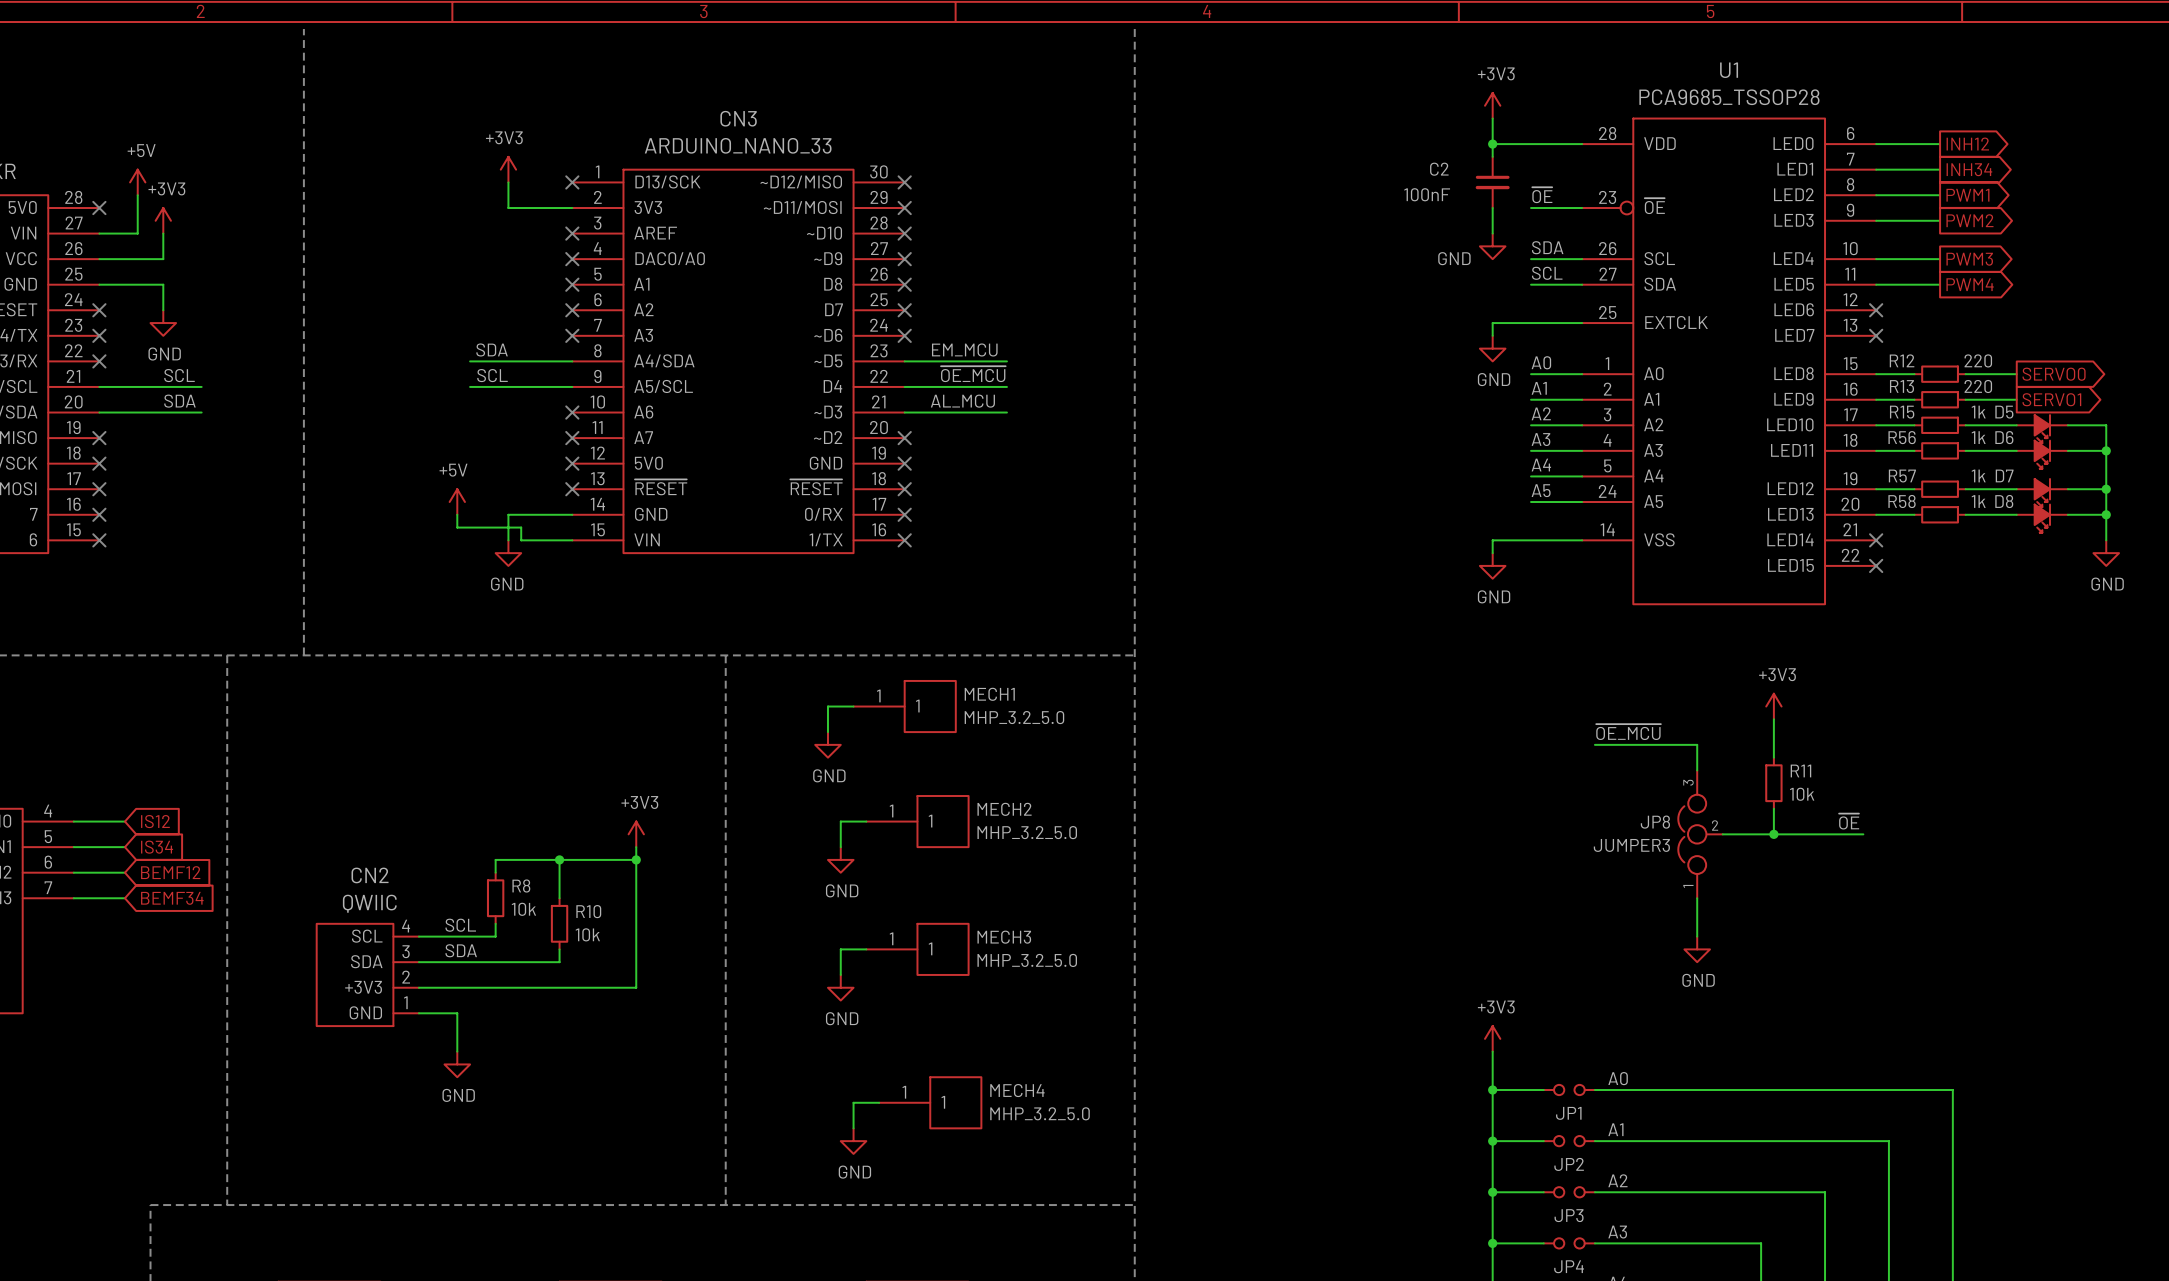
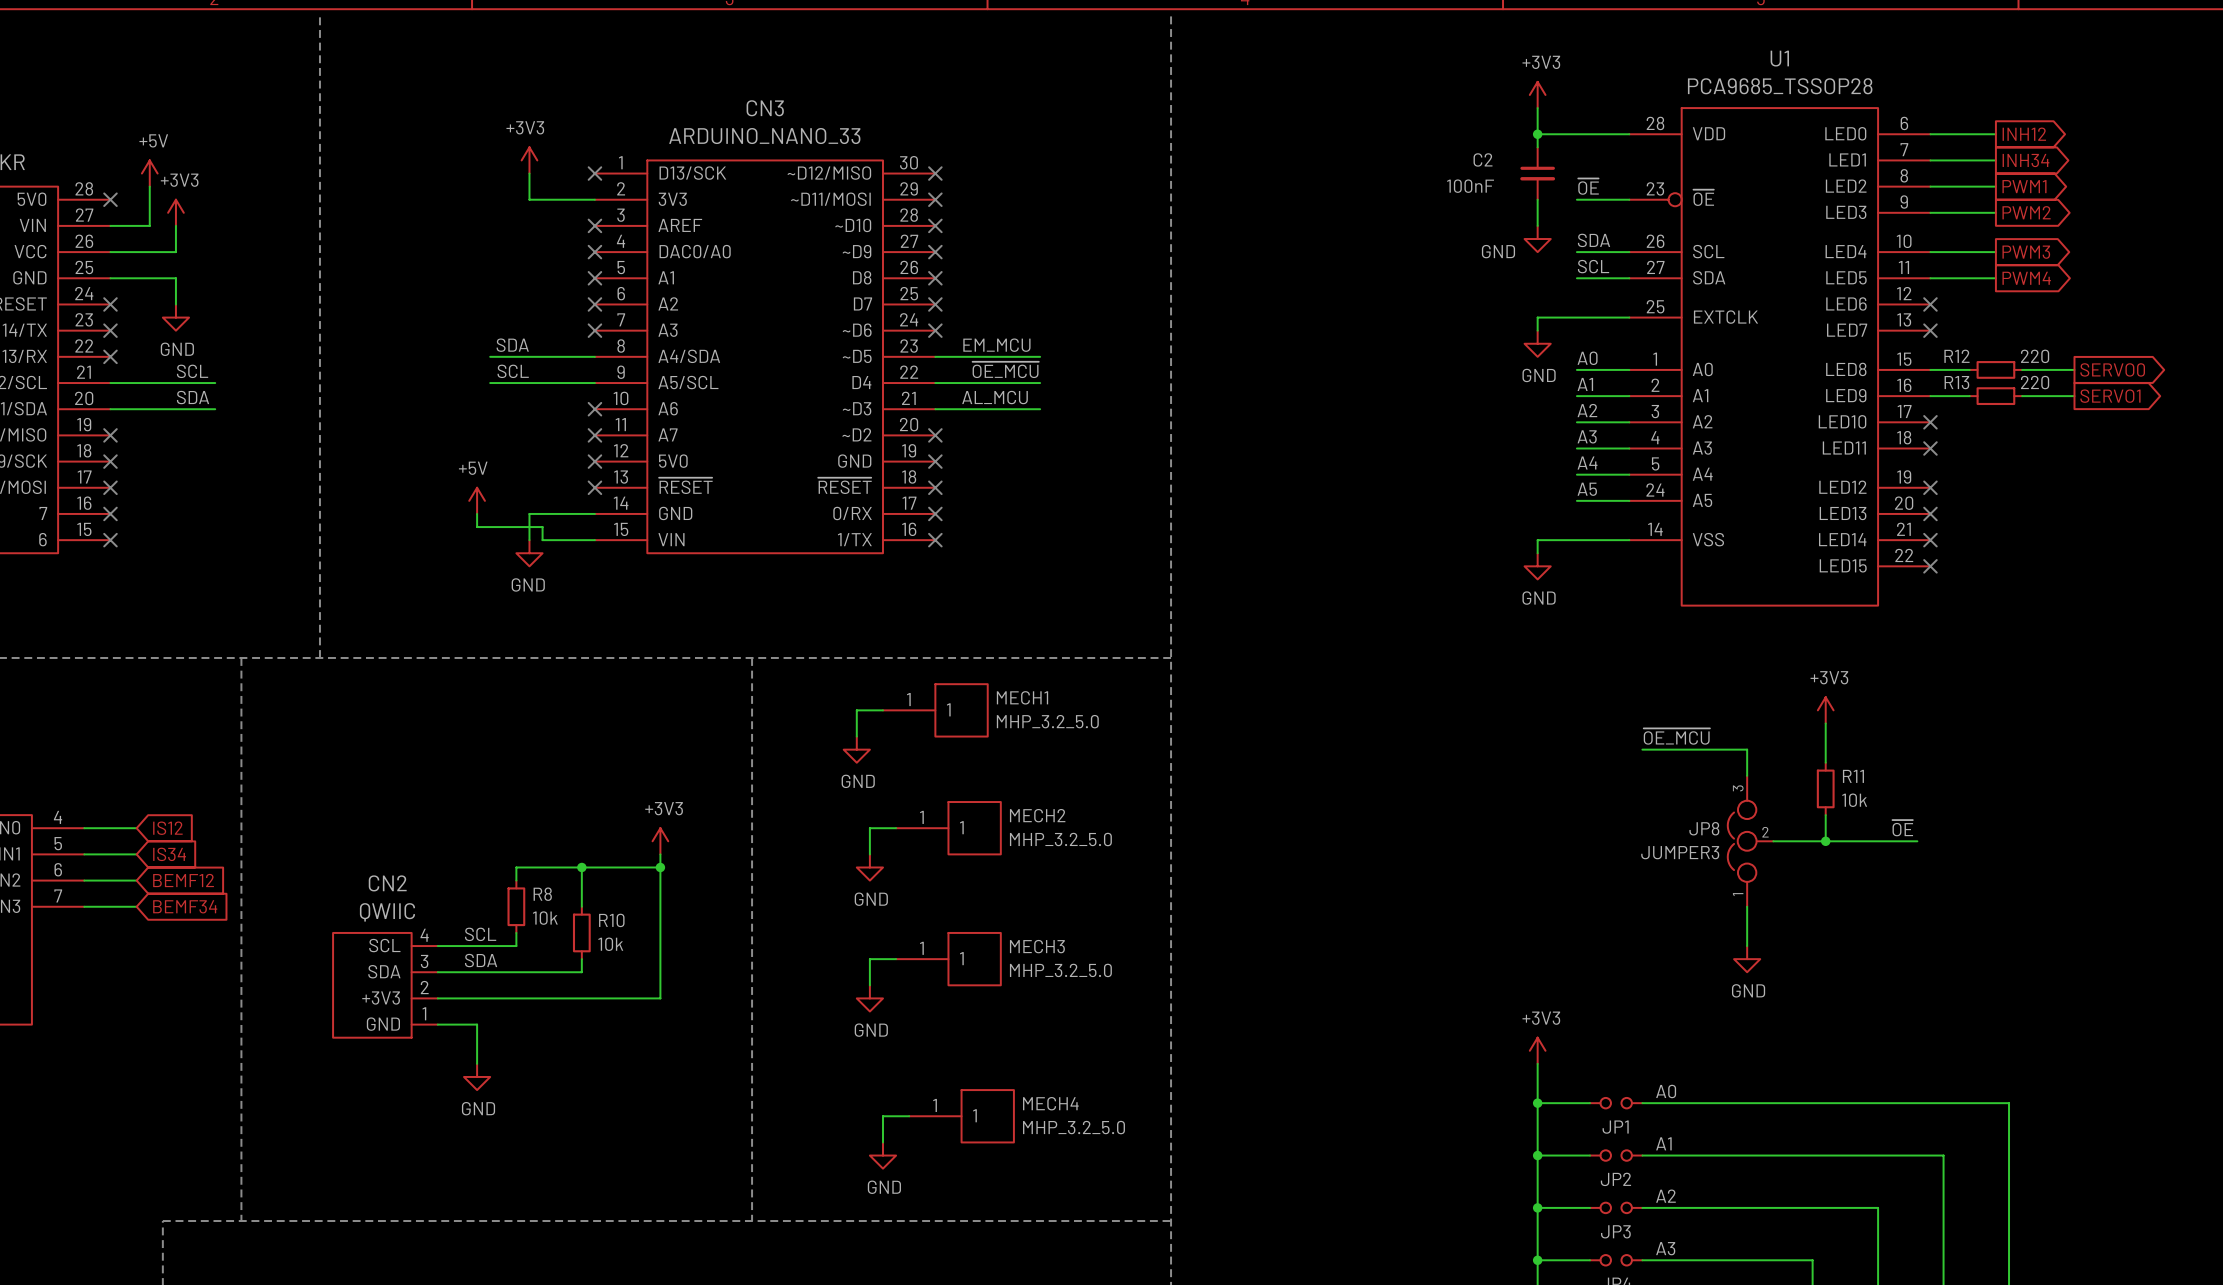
wire: (1876, 425) (1914, 425) -> none
no-connect mark: none -> (1930, 422)
R15: 1k (1940, 425) -> none
wire: (1965, 425) (2016, 425) -> none
wire: (2067, 425) (2106, 425) (2106, 540) -> none
D5: (2042, 429) -> none
wire: (1876, 450) (1914, 450) -> none
no-connect mark: none -> (1930, 448)
R56: 1k (1940, 450) -> none
wire: (1965, 450) (2016, 450) -> none
wire: (2067, 450) (2106, 450) -> none
junction: (2106, 450) -> none
D6: (2042, 454) -> none
wire: (1876, 489) (1914, 489) -> none
no-connect mark: none -> (1930, 487)
R57: 1k (1940, 489) -> none
wire: (1965, 489) (2016, 489) -> none
wire: (2067, 489) (2106, 489) -> none
junction: (2106, 489) -> none
D7: (2042, 493) -> none
wire: (1876, 514) (1914, 514) -> none
no-connect mark: none -> (1930, 513)
R58: 1k (1940, 514) -> none
wire: (1965, 514) (2016, 514) -> none
wire: (2067, 514) (2106, 514) -> none
junction: (2106, 514) -> none
D8: (2042, 518) -> none
power symbol: GND (2106, 553) -> none

